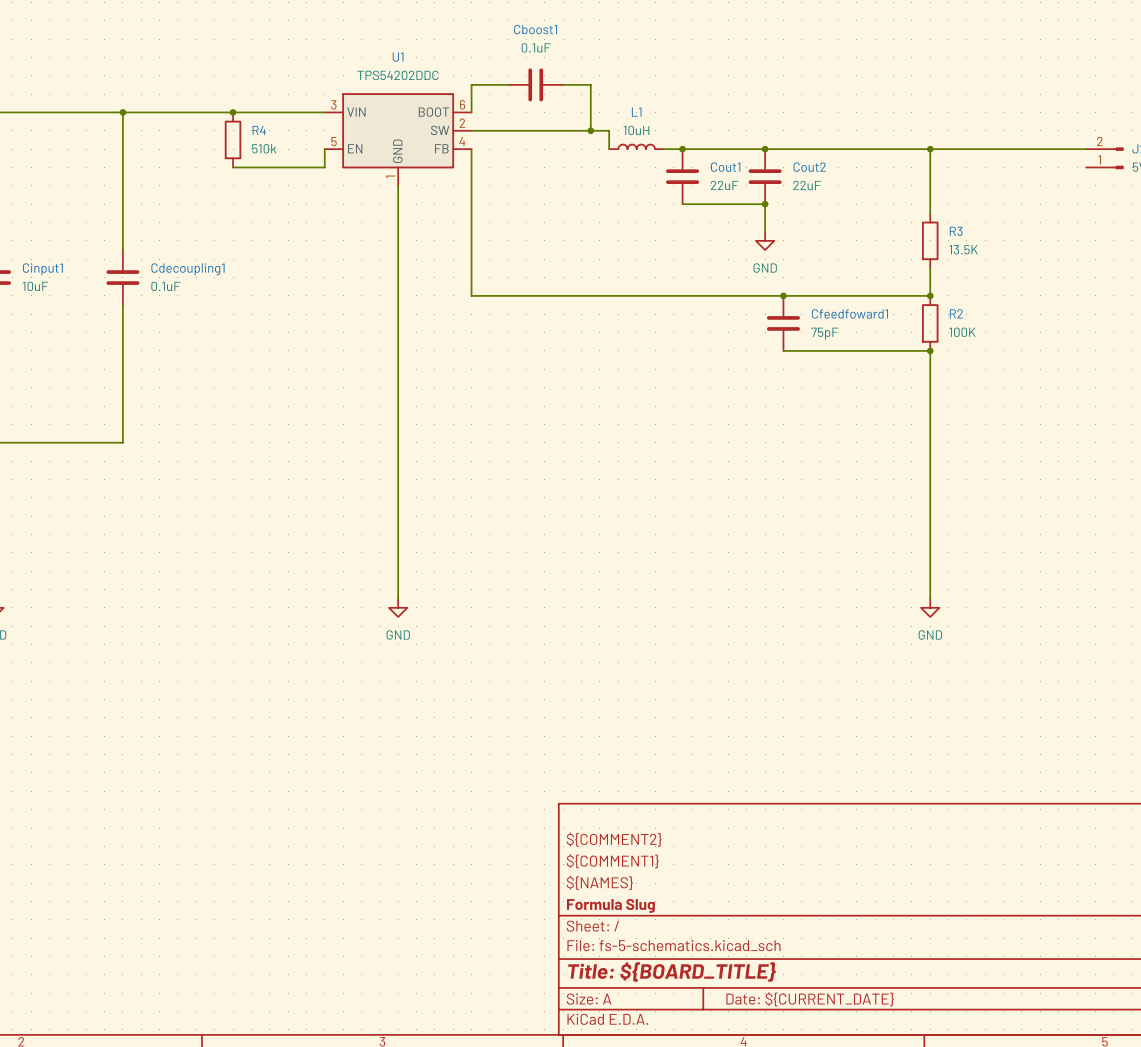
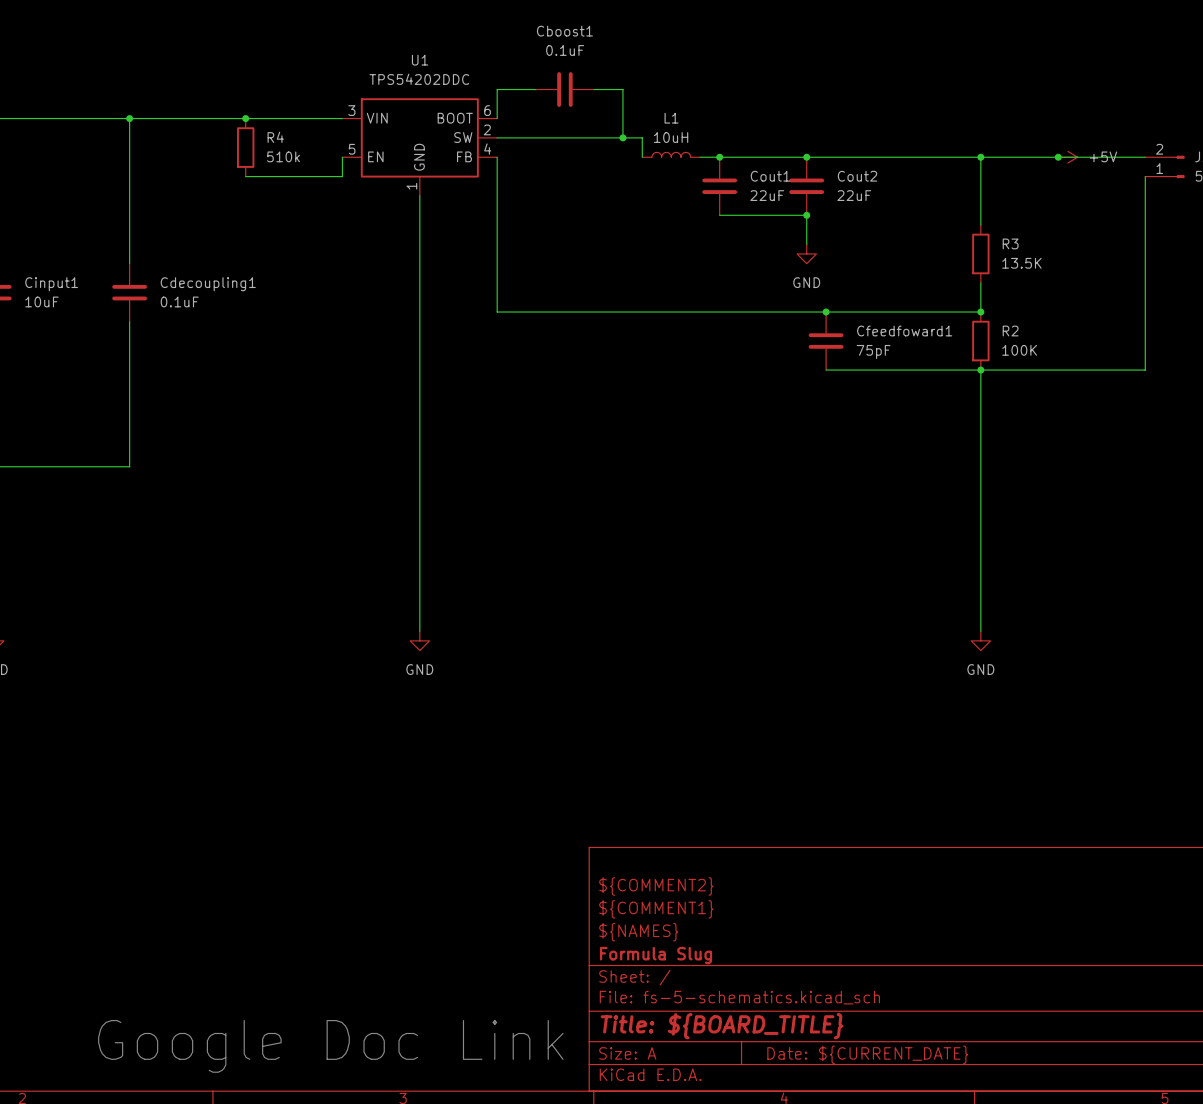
junction: none -> (1058, 157)
power symbol: none -> +5V (1067, 157)
wire: none -> (1145, 176) (1145, 370) (980, 370)
text: none -> Google Doc Link (330, 1046)

